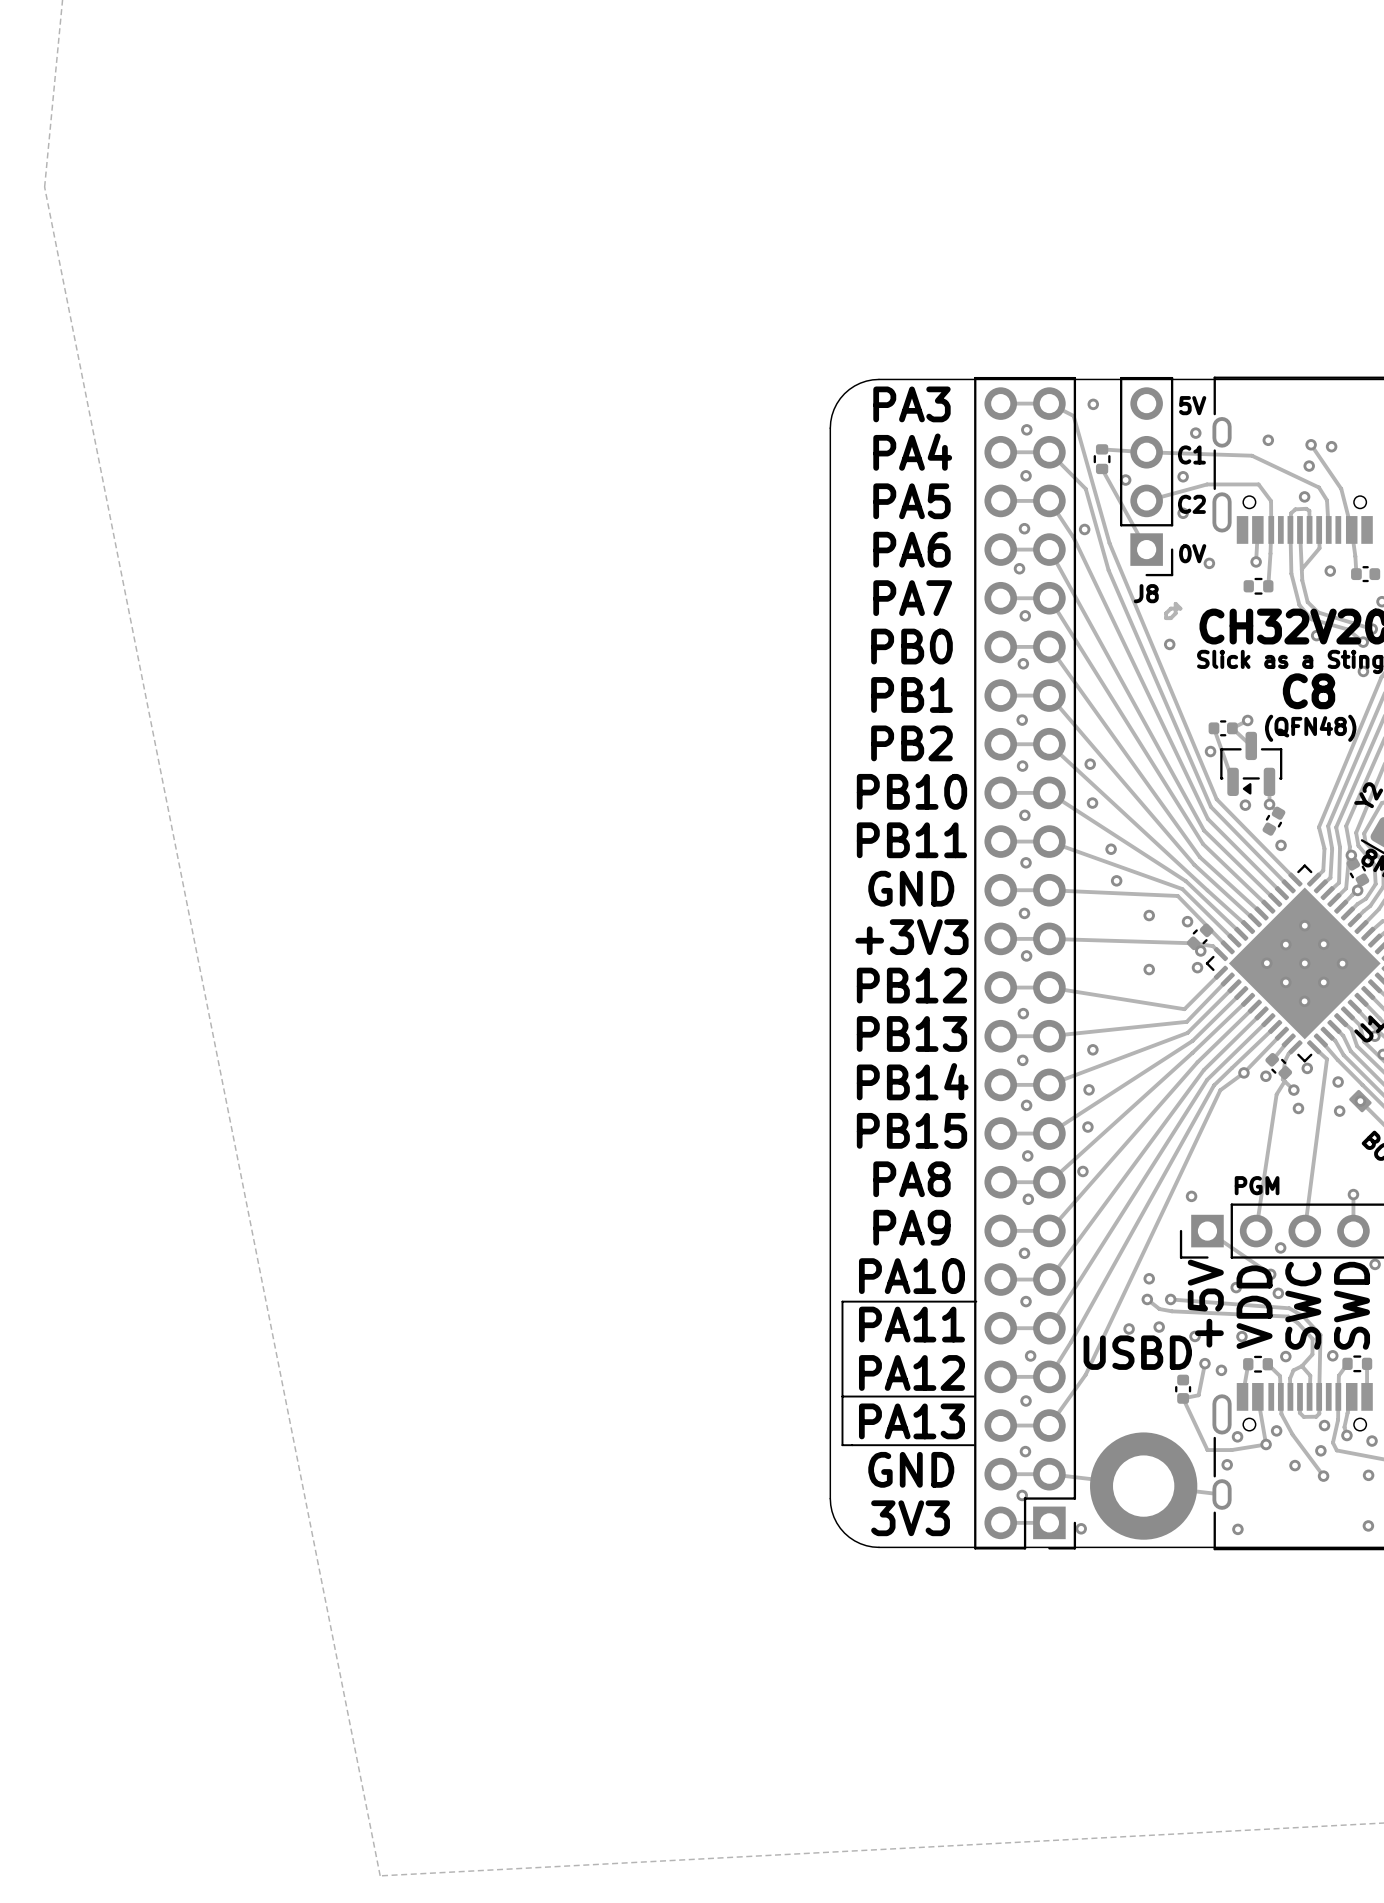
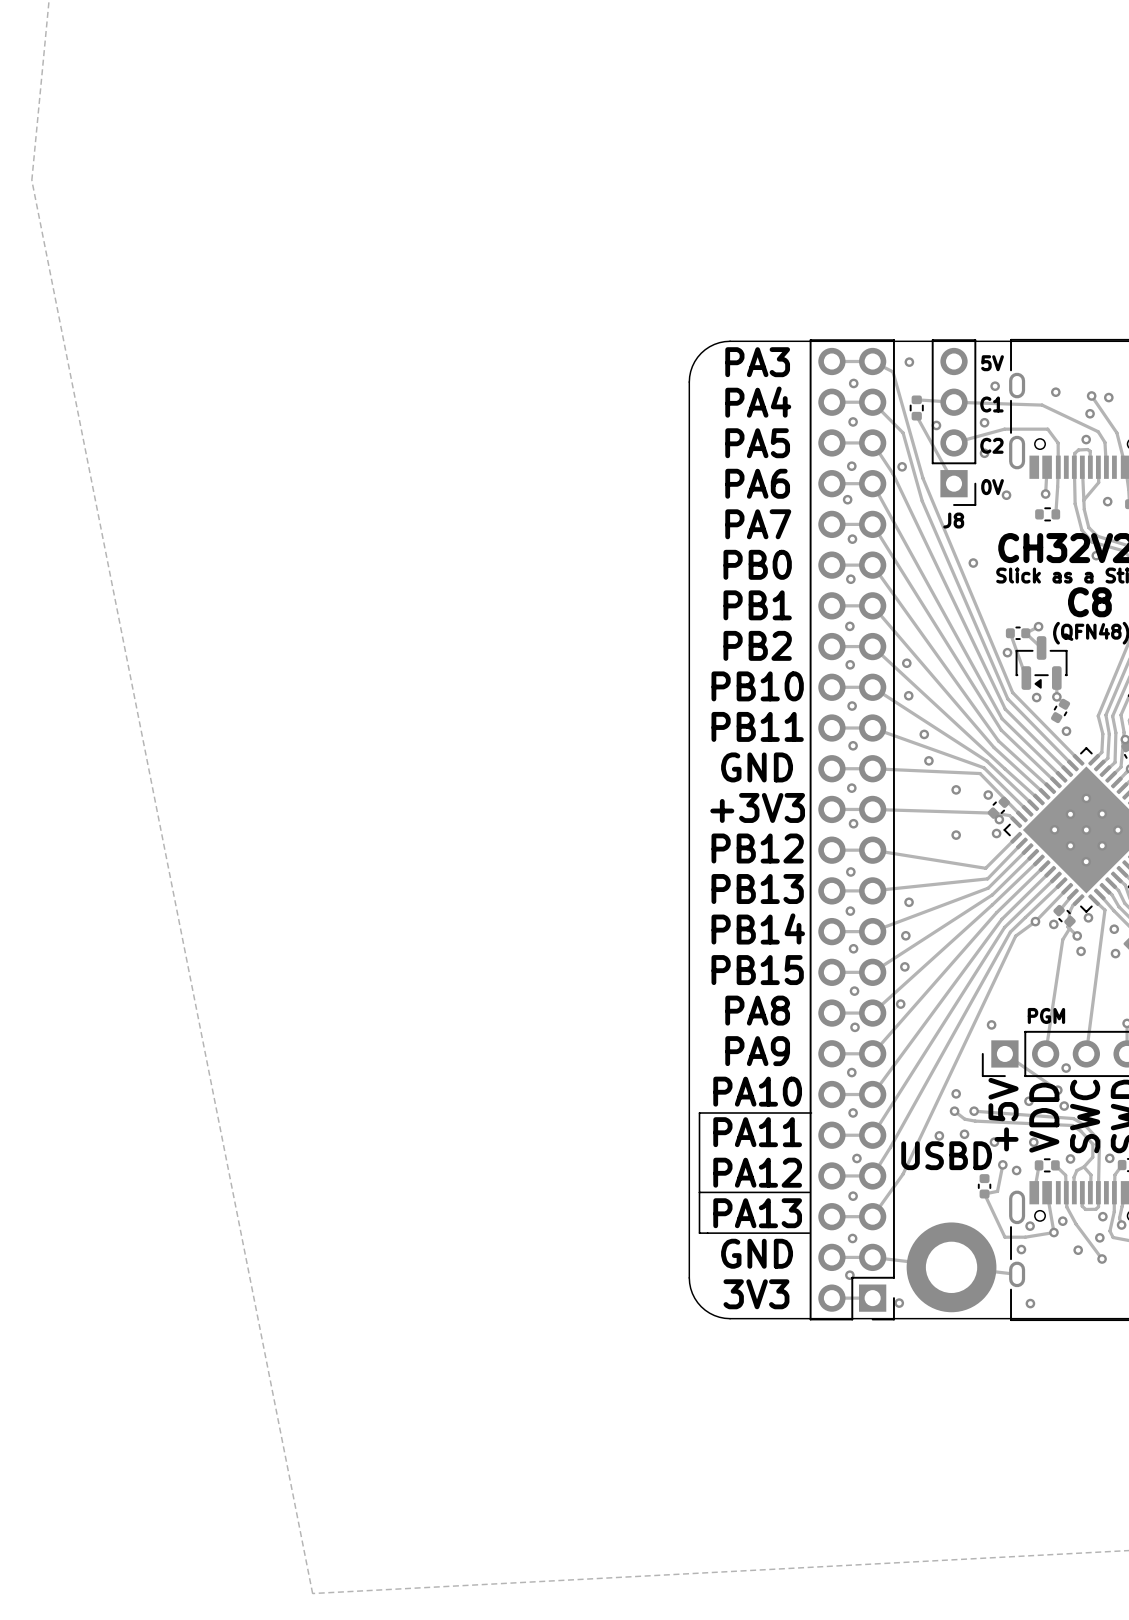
track: (1175, 603) (1175, 613) (1170, 618) (1166, 618) (1166, 613) (1170, 608) (1180, 608) (1175, 603) -> none

